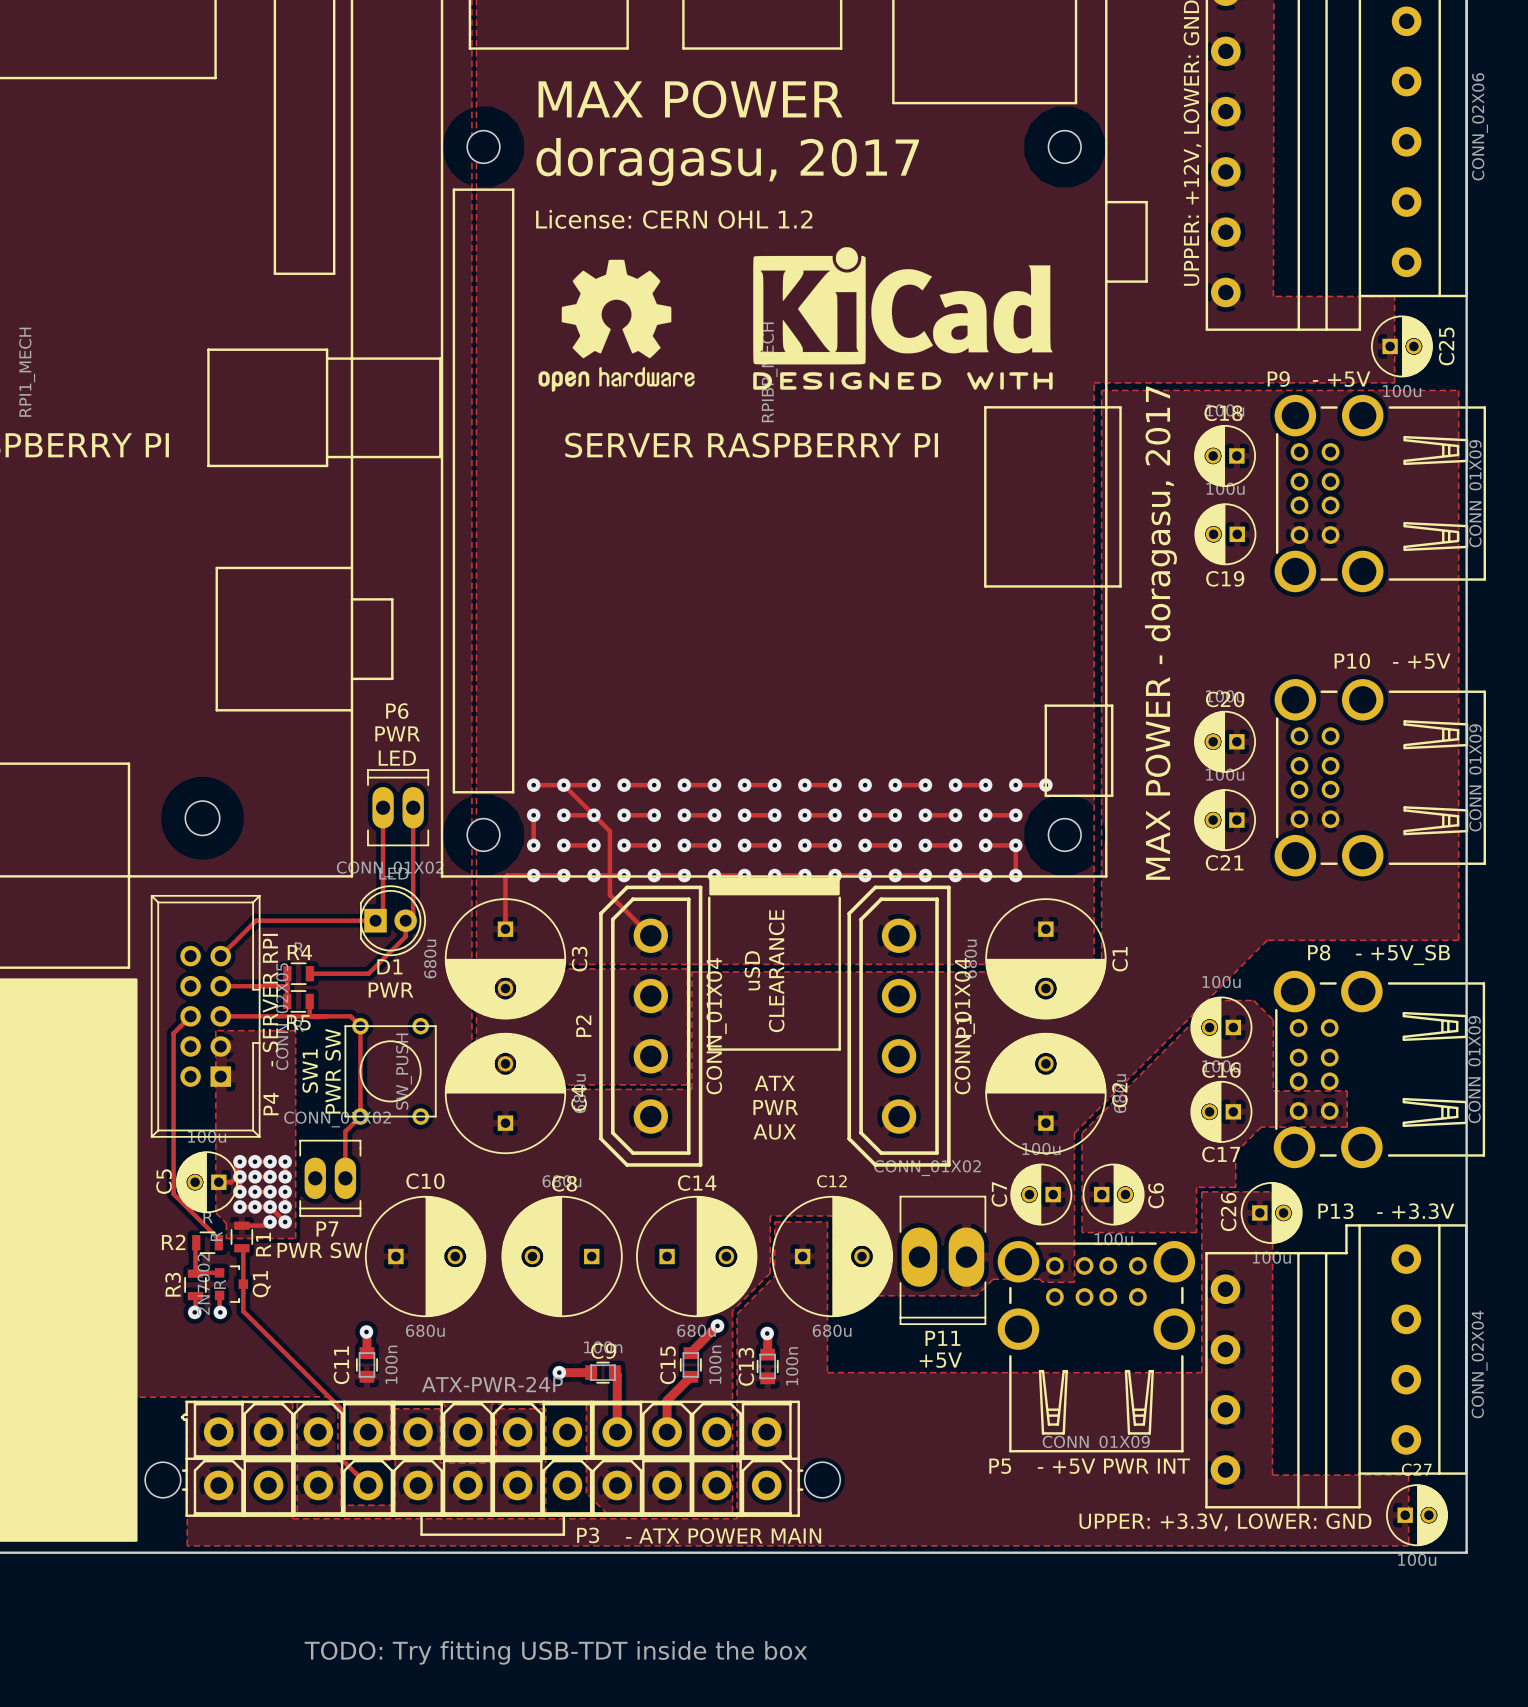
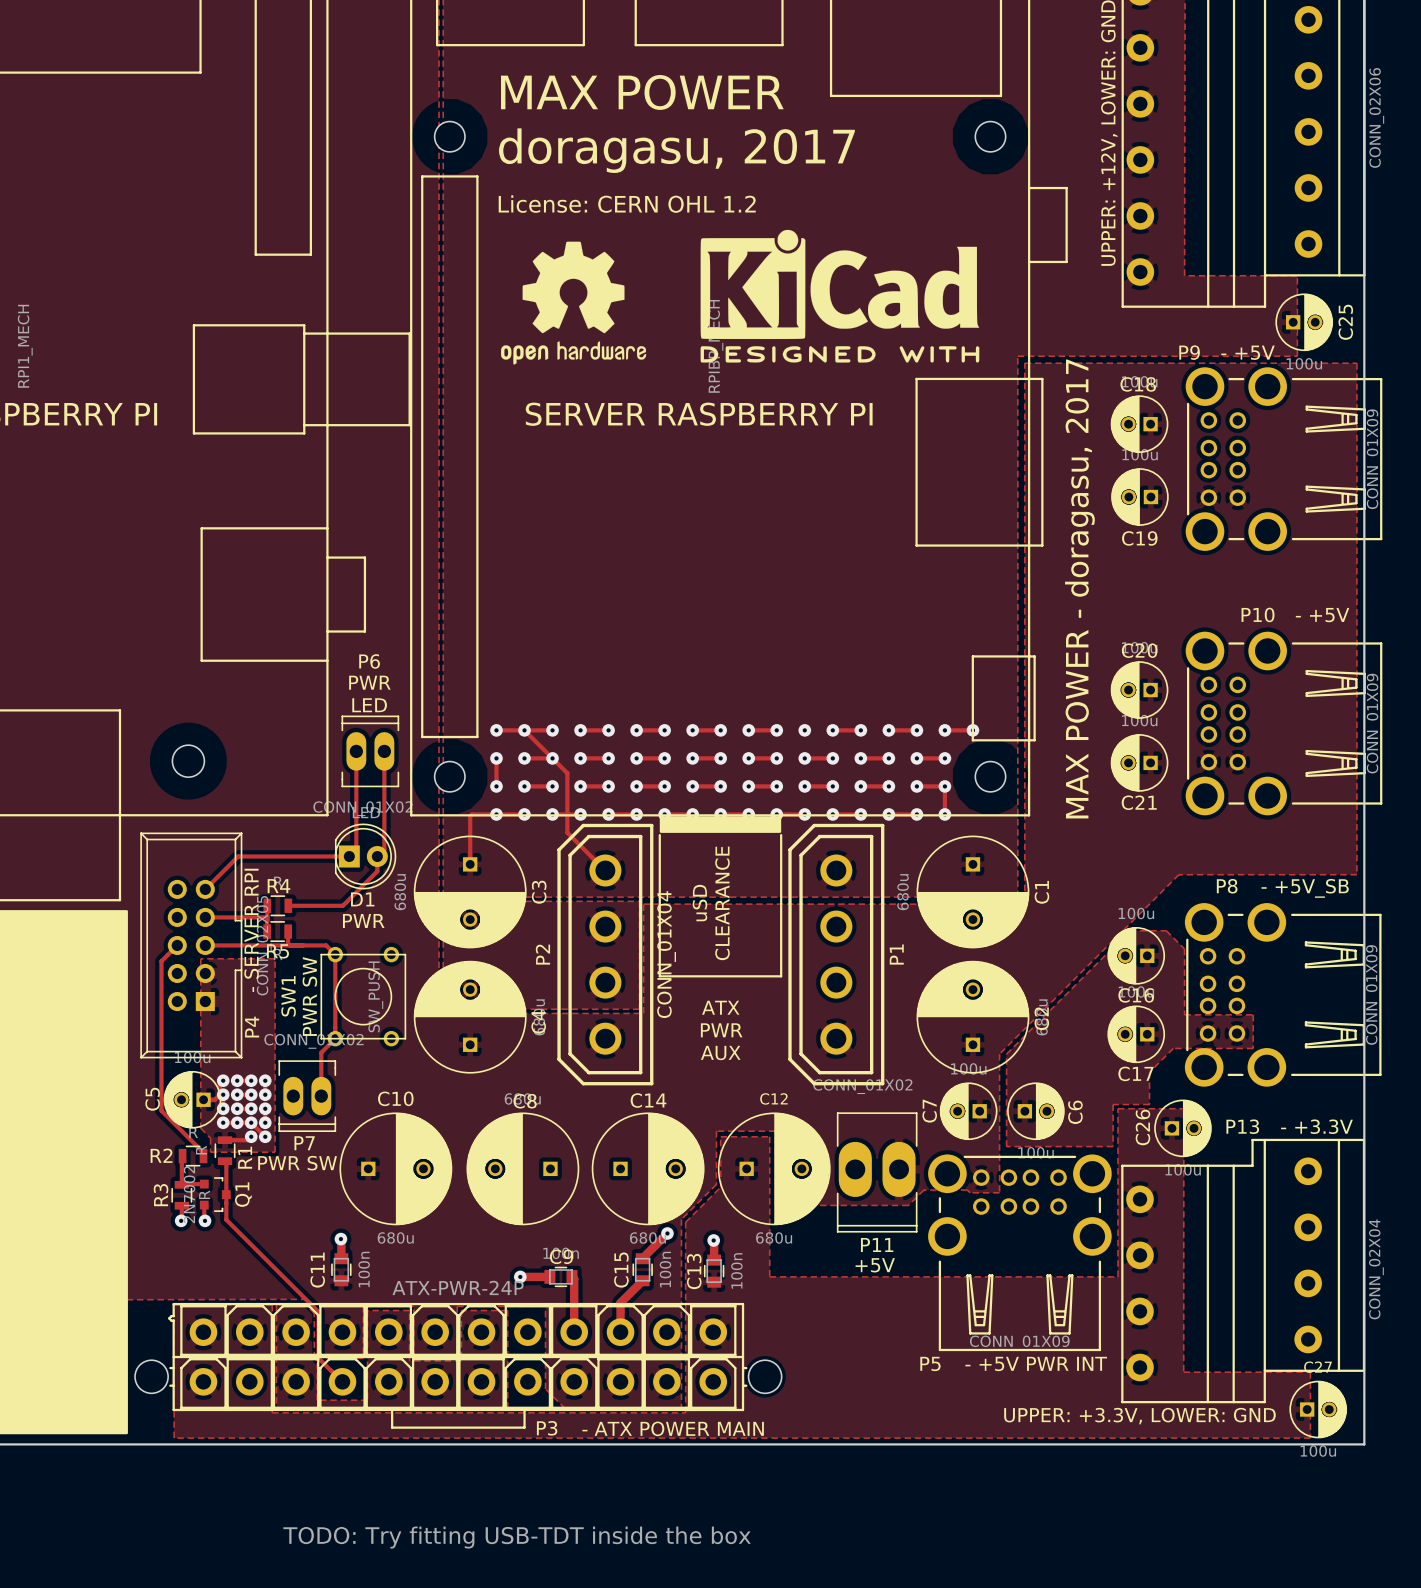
P1 value: CONN_01X04 (964, 1026) -> none

